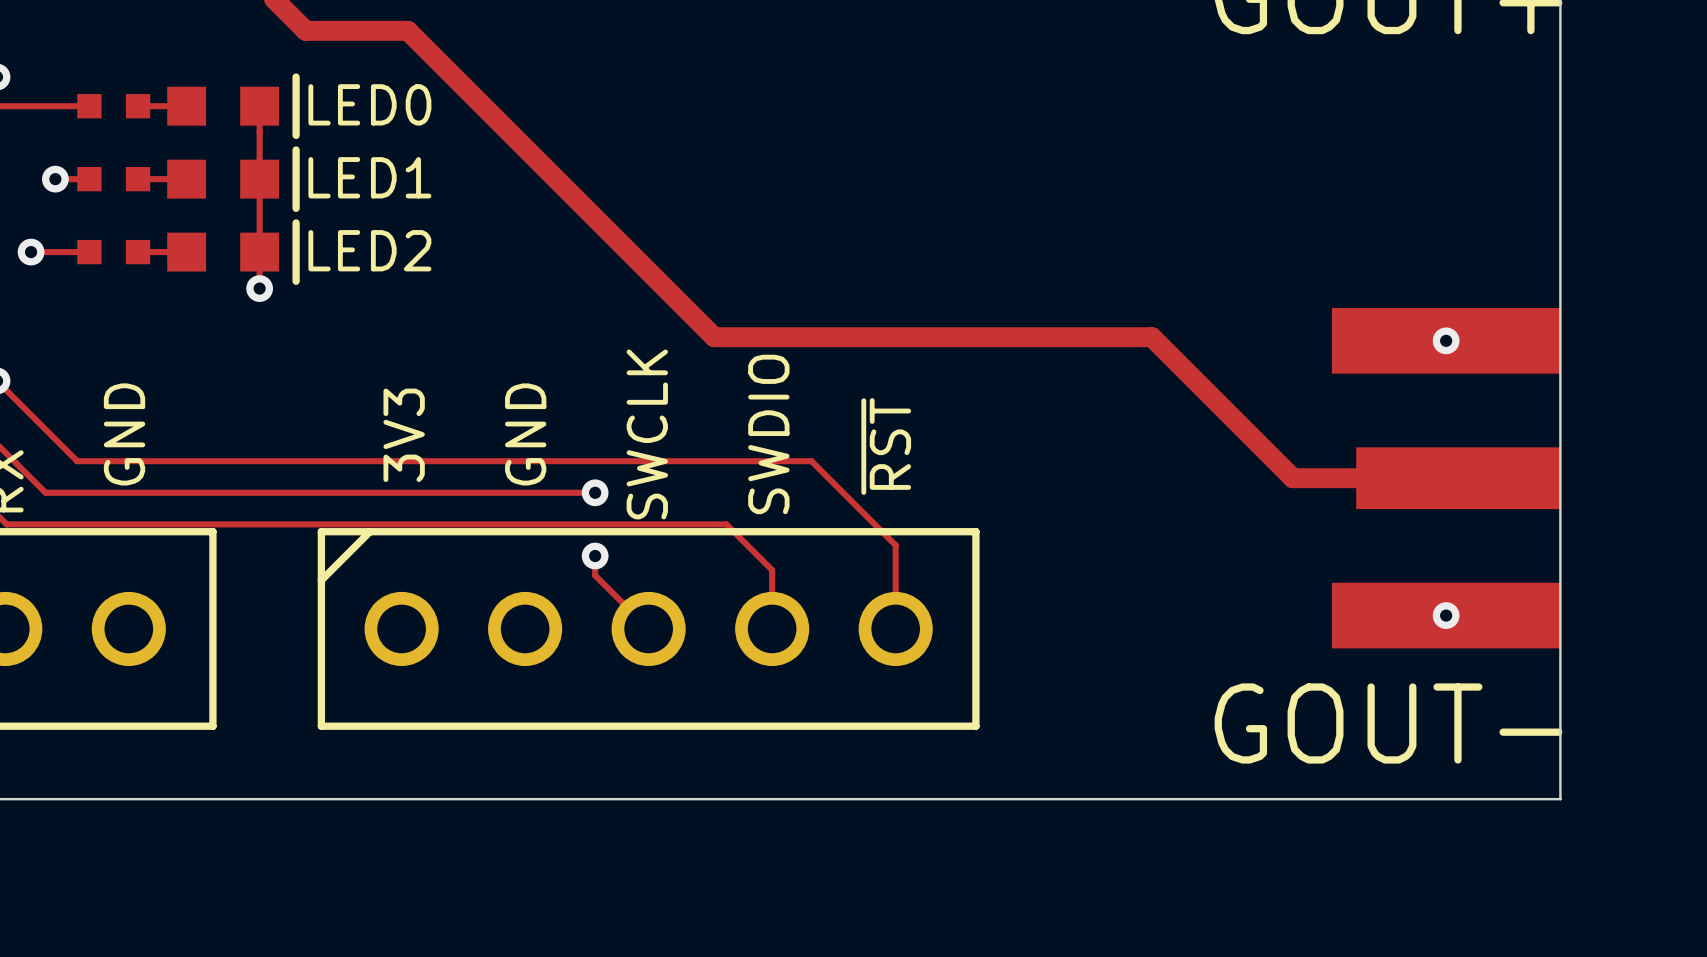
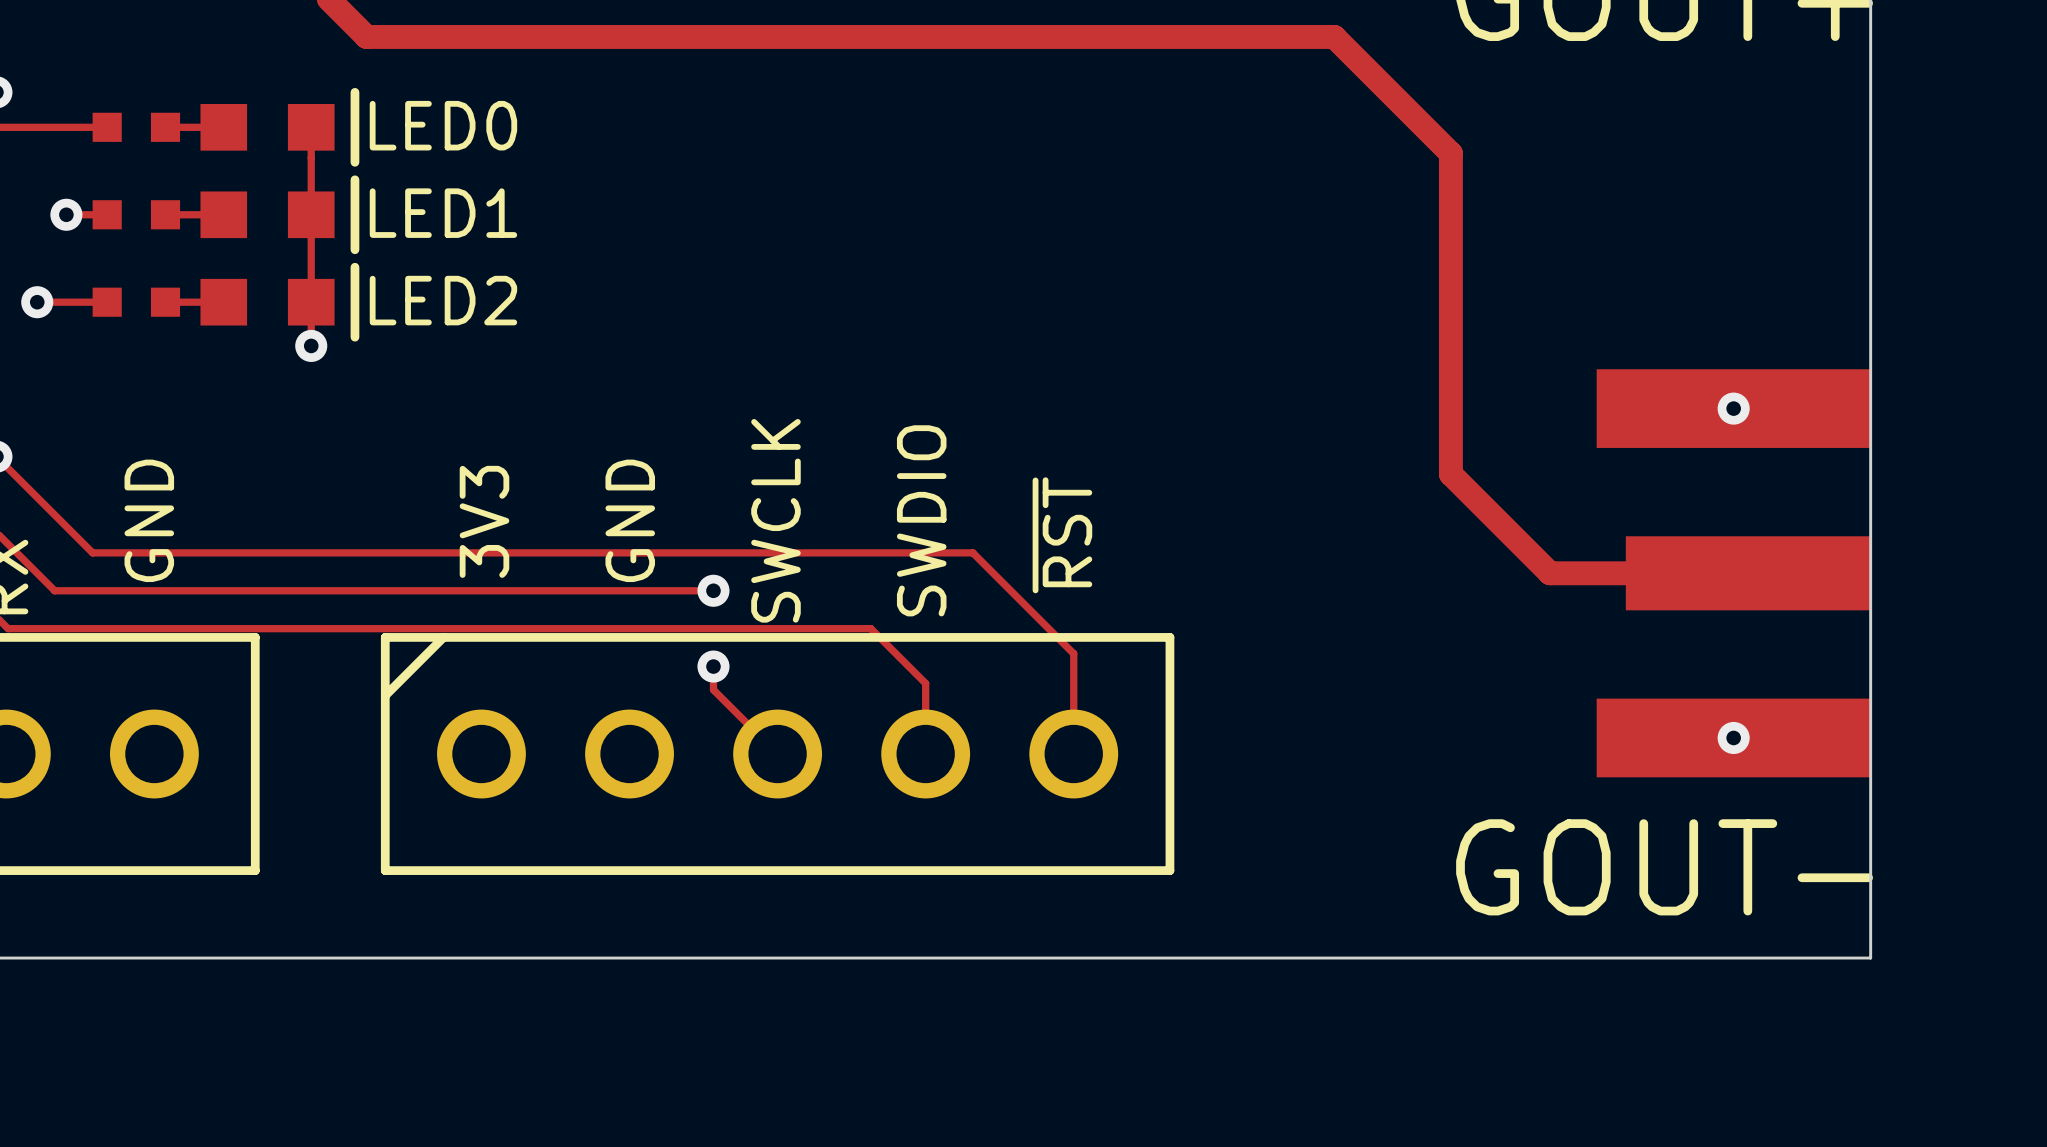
track: (407, 30) (714, 337) (1151, 337) (1210, 395) -> (489, 36) (1334, 36) (1450, 153) (1450, 474)

